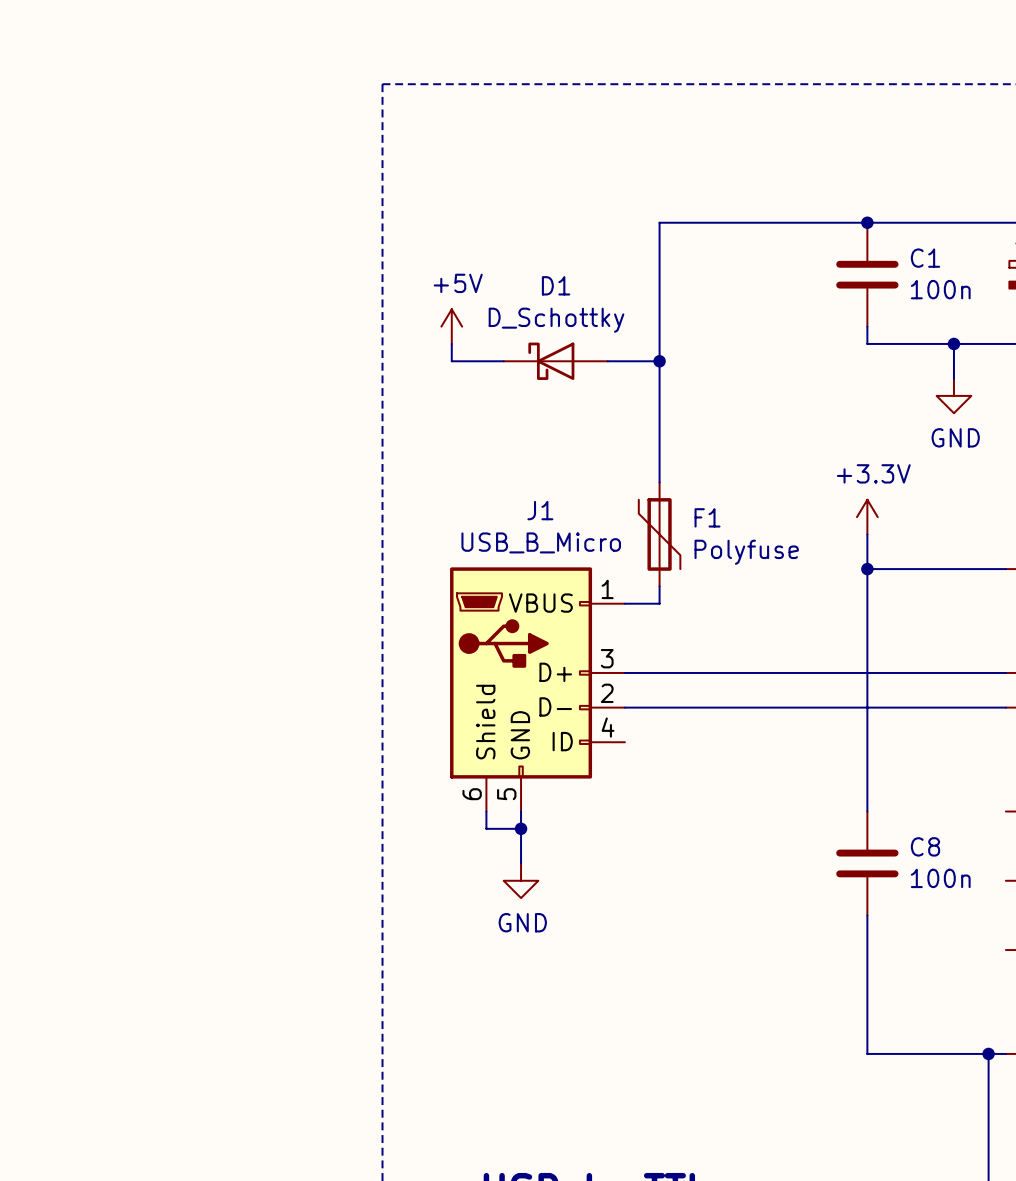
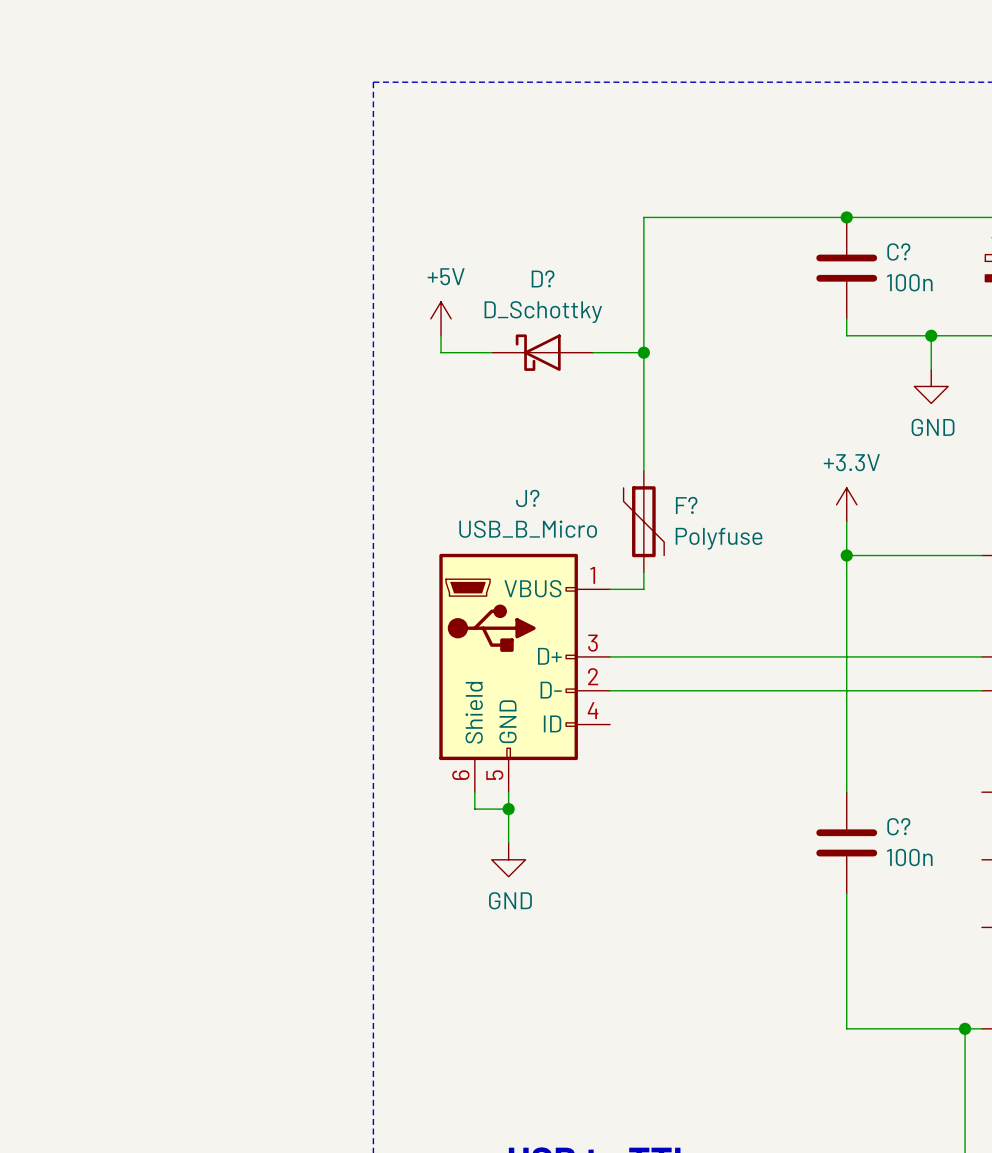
C1 name: C1 (925, 258) -> C? (898, 251)
D1 name: D1 (556, 285) -> D? (543, 278)
J1 name: J1 (540, 510) -> J? (527, 498)
F1 name: F1 (707, 517) -> F? (686, 505)
C8 name: C8 (925, 846) -> C? (898, 826)

